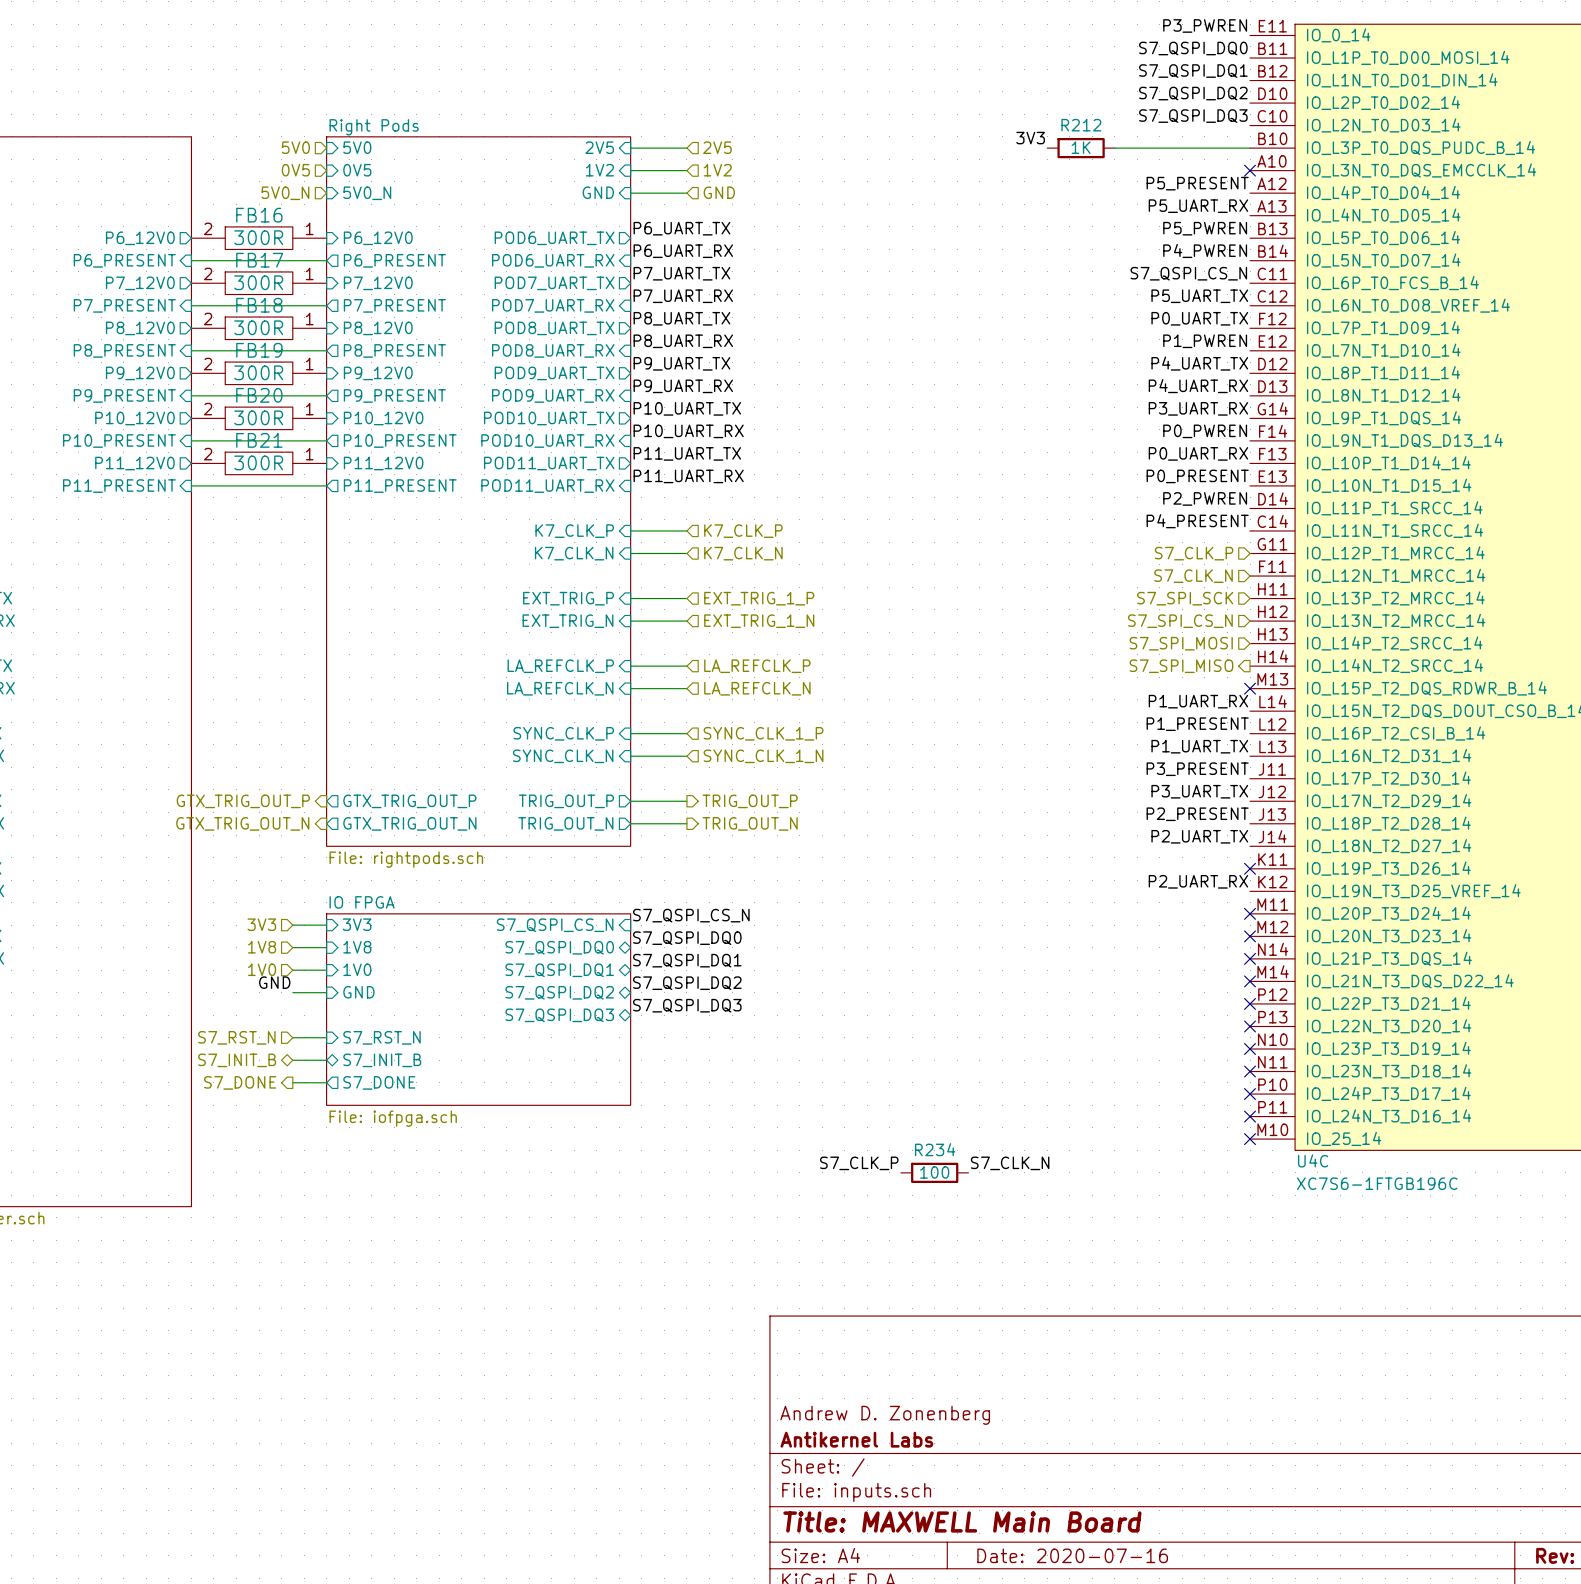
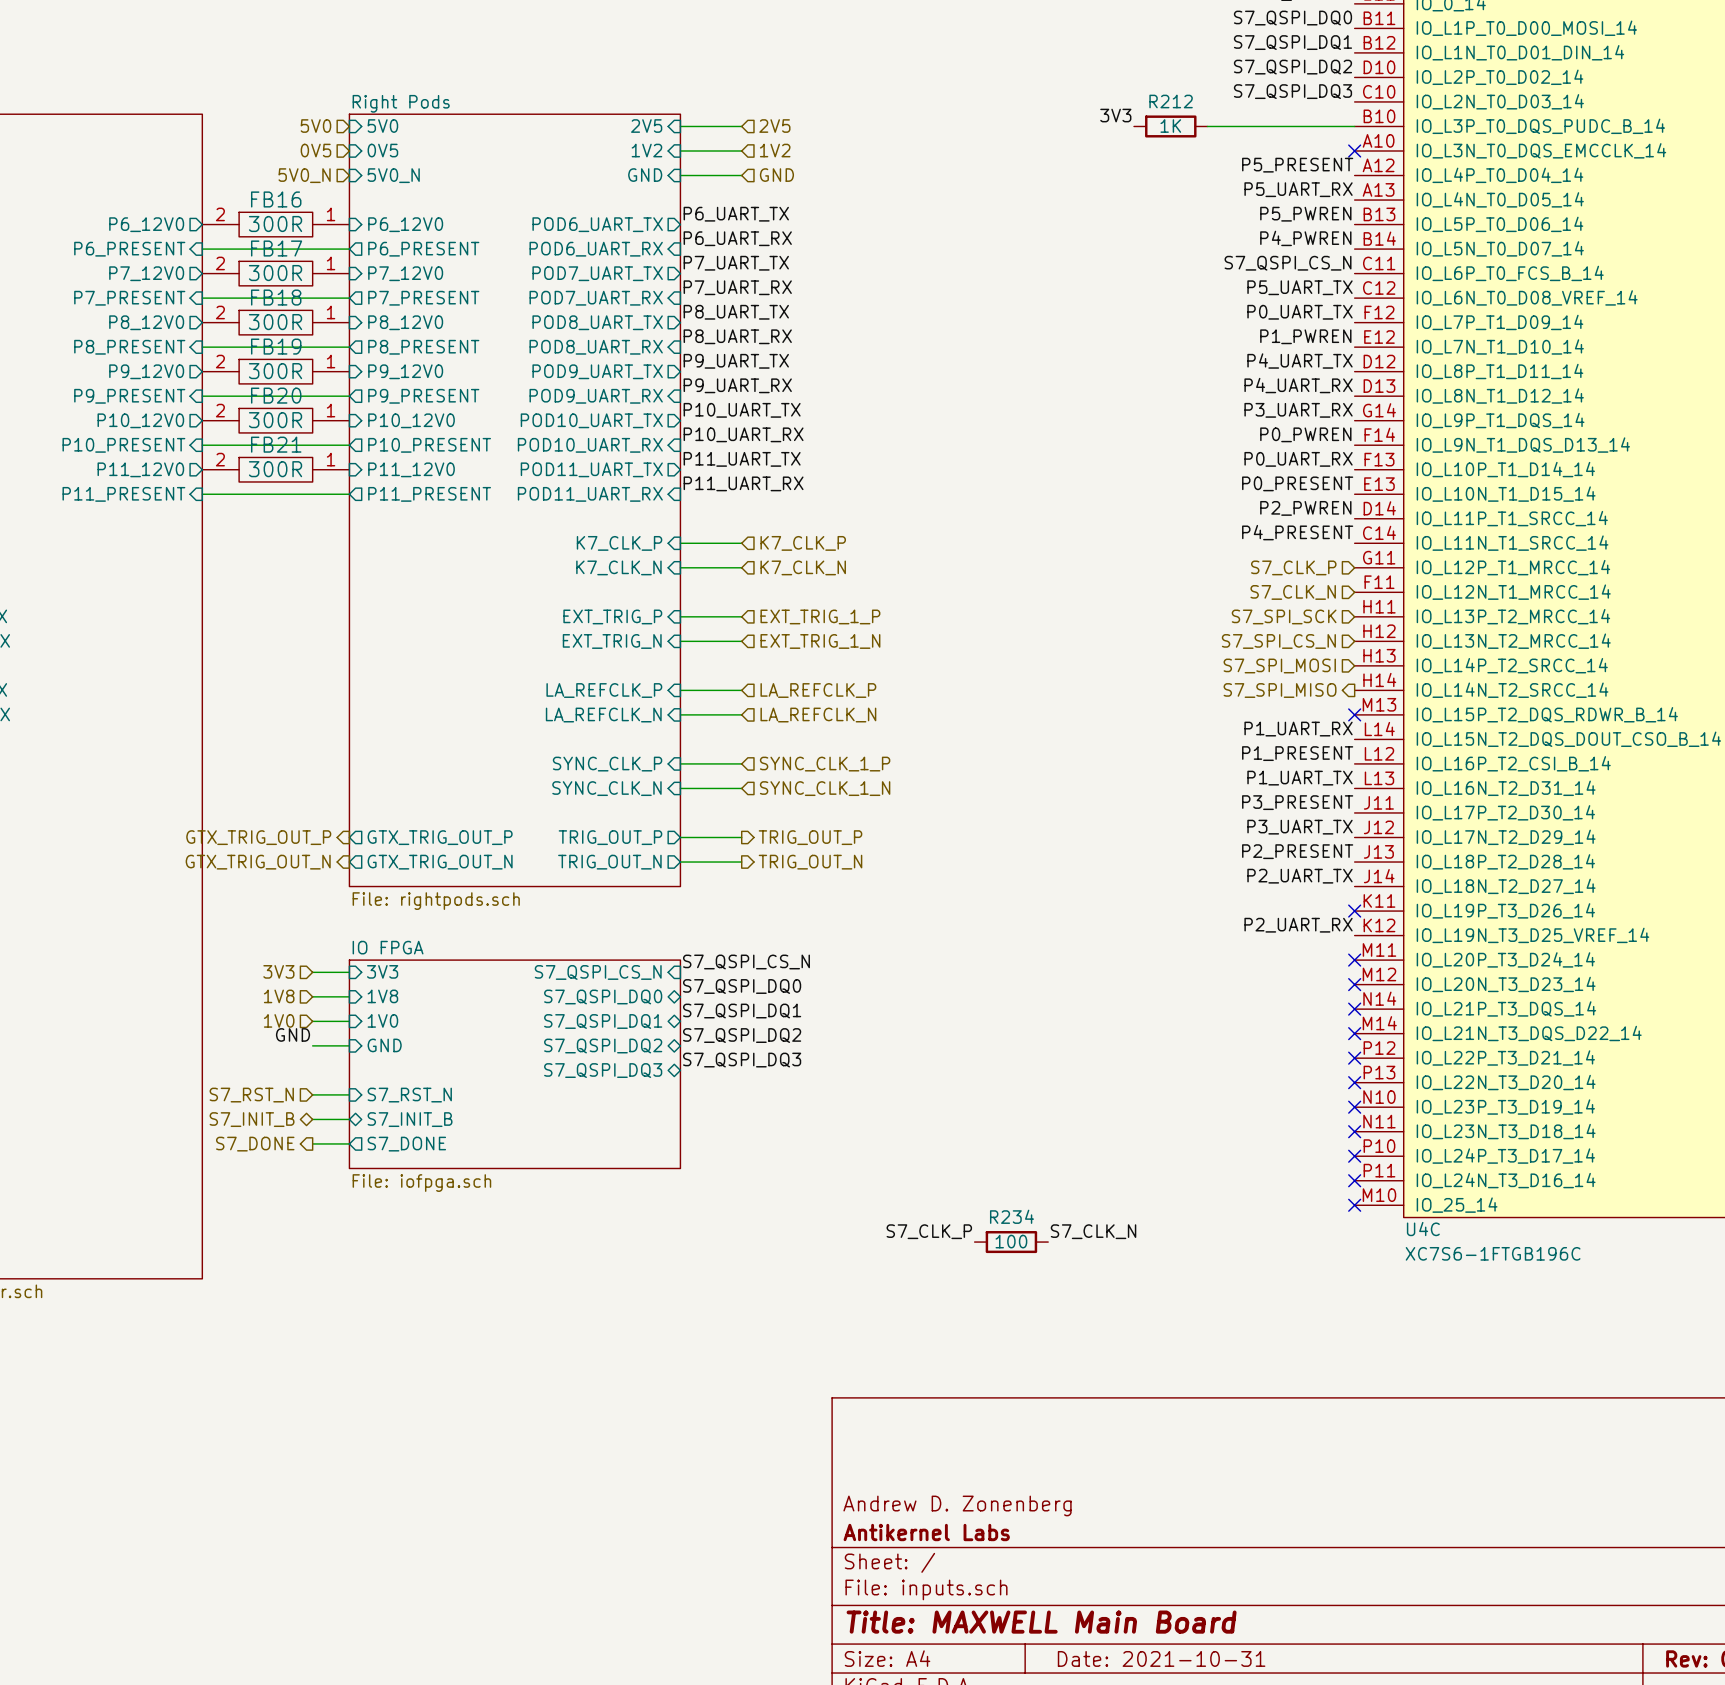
title block: Date: 2020-07-16 (1072, 1555) -> Date: 2021-10-31 (1161, 1658)

